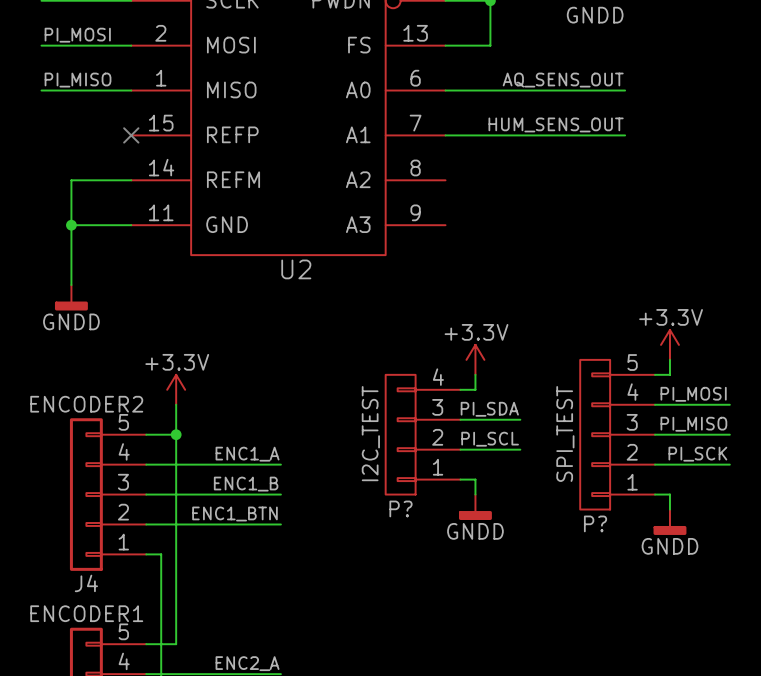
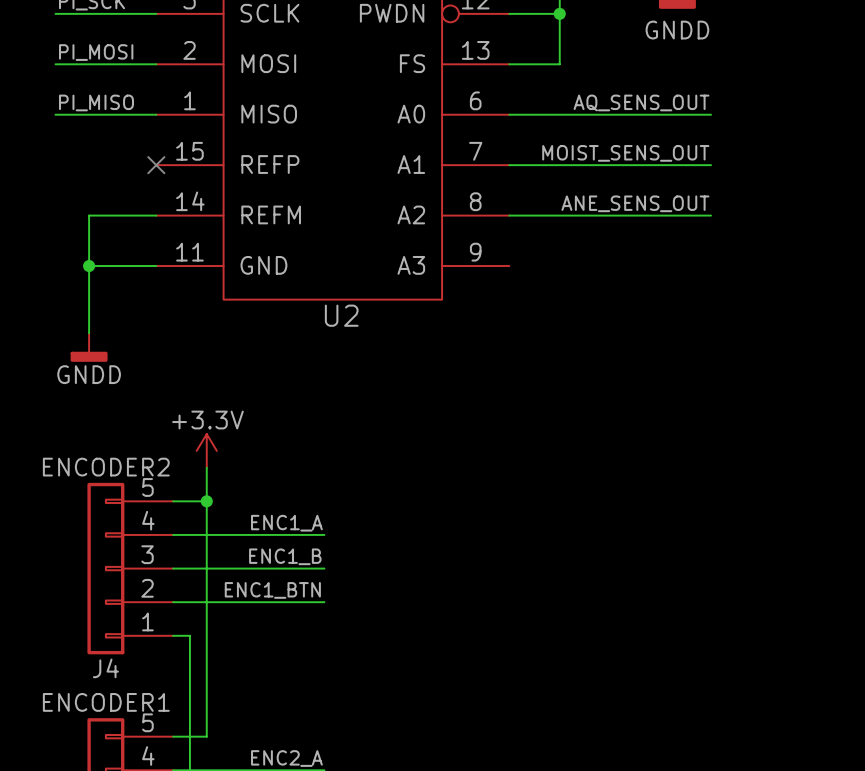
label: HUM_SENS_OUT (556, 124) -> MOIST_SENS_OUT (625, 153)
label: none -> ANE_SENS_OUT (635, 203)
wire: none -> (509, 215) (711, 215)
power symbol: +3.3V (669, 344) -> none
power symbol: +3.3V (475, 359) -> none
wire: (669, 359) (669, 374) (655, 374) -> none
wire: (475, 374) (475, 389) (460, 389) -> none
label: PI_MOSI (693, 394) -> none
wire: (655, 404) (729, 404) -> none
label: PI_SDA (489, 409) -> none
wire: (460, 419) (520, 419) -> none
label: PI_MISO (693, 424) -> none
P?: I2C_TEST (423, 434) -> none
P?: SPI_TEST (617, 434) -> none
wire: (655, 434) (729, 434) -> none
label: PI_SCL (490, 439) -> none
wire: (460, 449) (520, 449) -> none
label: PI_SCK (697, 454) -> none
wire: (655, 464) (729, 464) -> none
wire: (460, 479) (475, 479) (475, 494) -> none
wire: (655, 494) (669, 494) (669, 509) -> none
power symbol: GNDD (475, 507) -> none
power symbol: GNDD (669, 522) -> none

